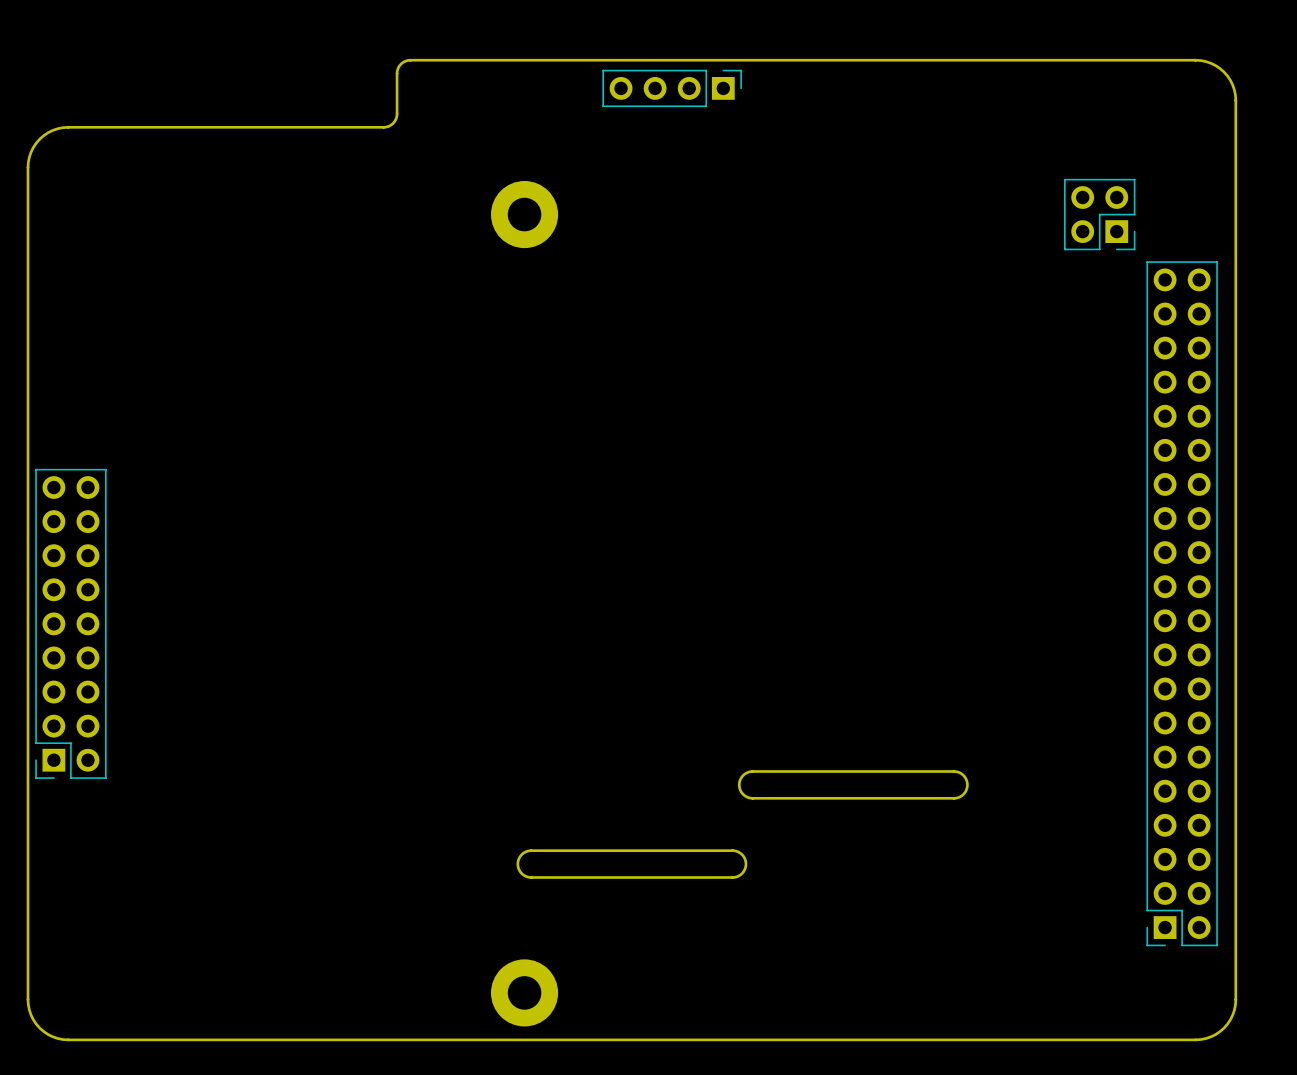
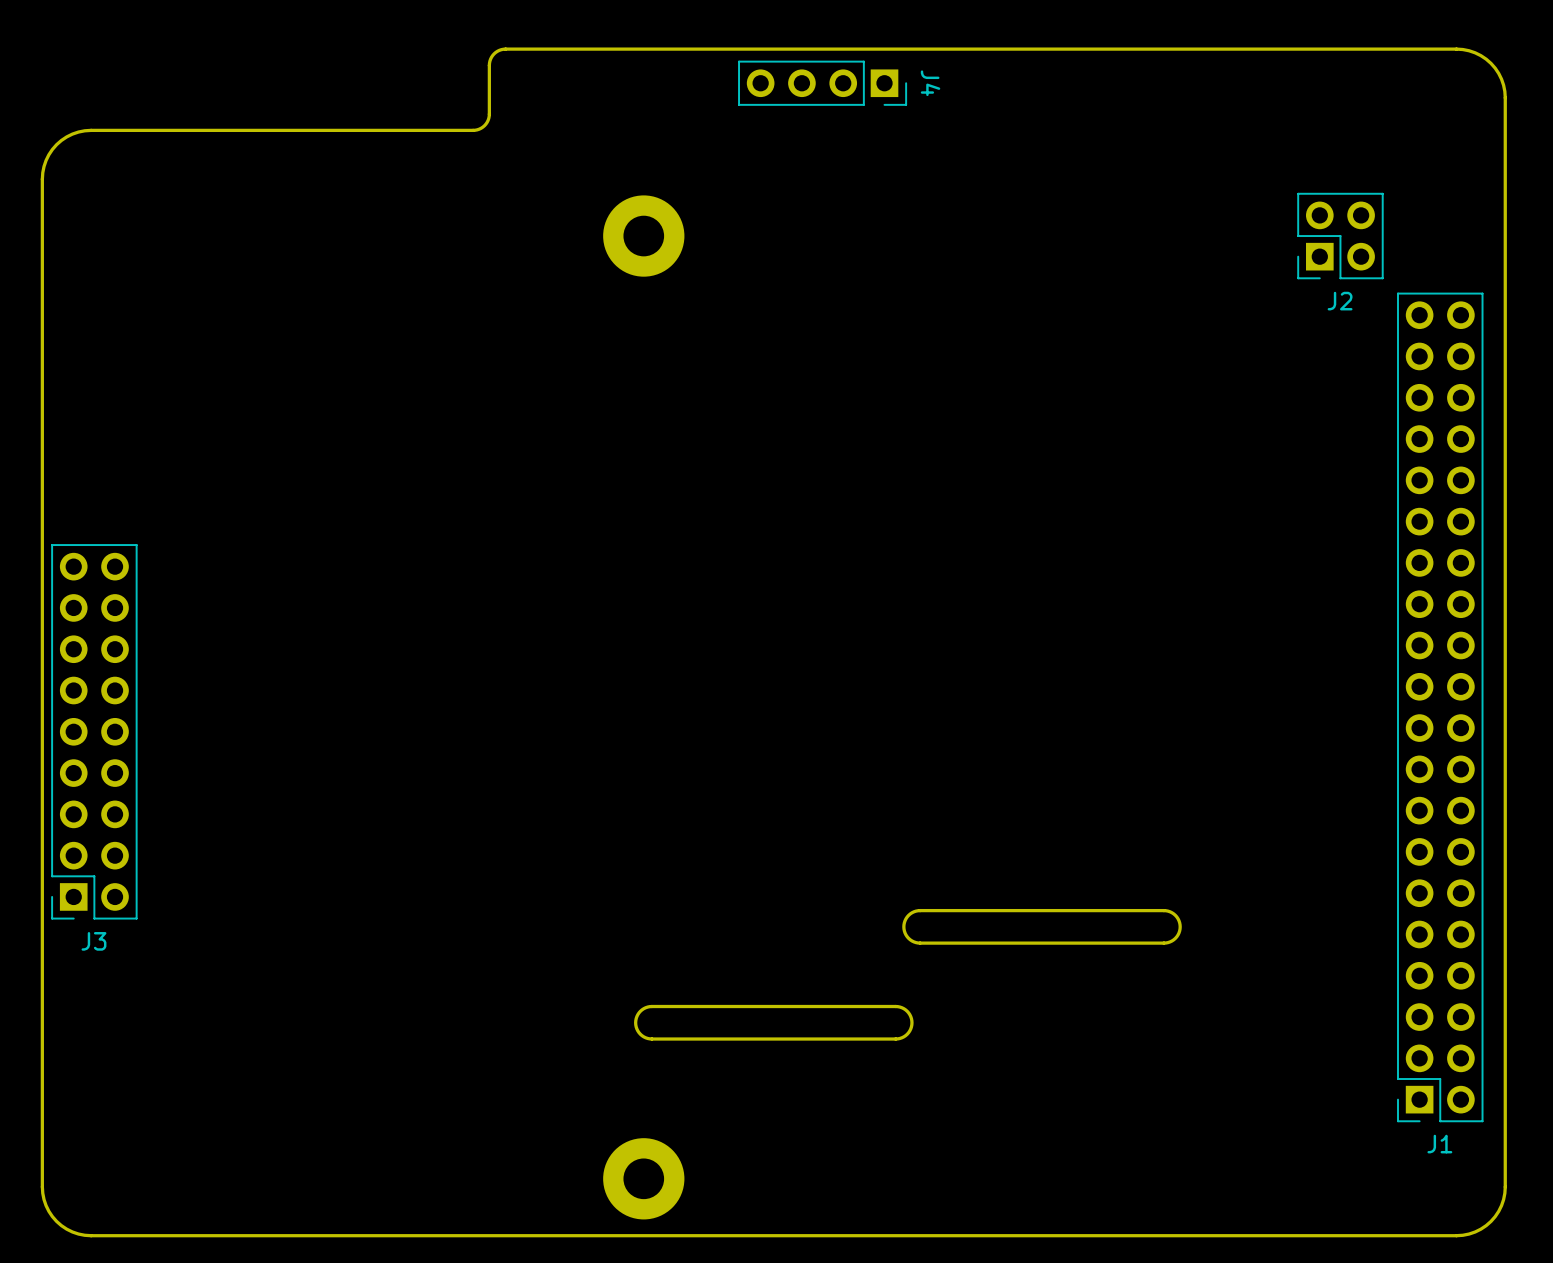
part: (672, 88) -> none
J4: none -> (822, 83)
part: (1099, 214) -> none
J2: none -> (1340, 236)
J3 name: none -> J3 (93, 941)
J1 name: none -> J1 (1439, 1144)

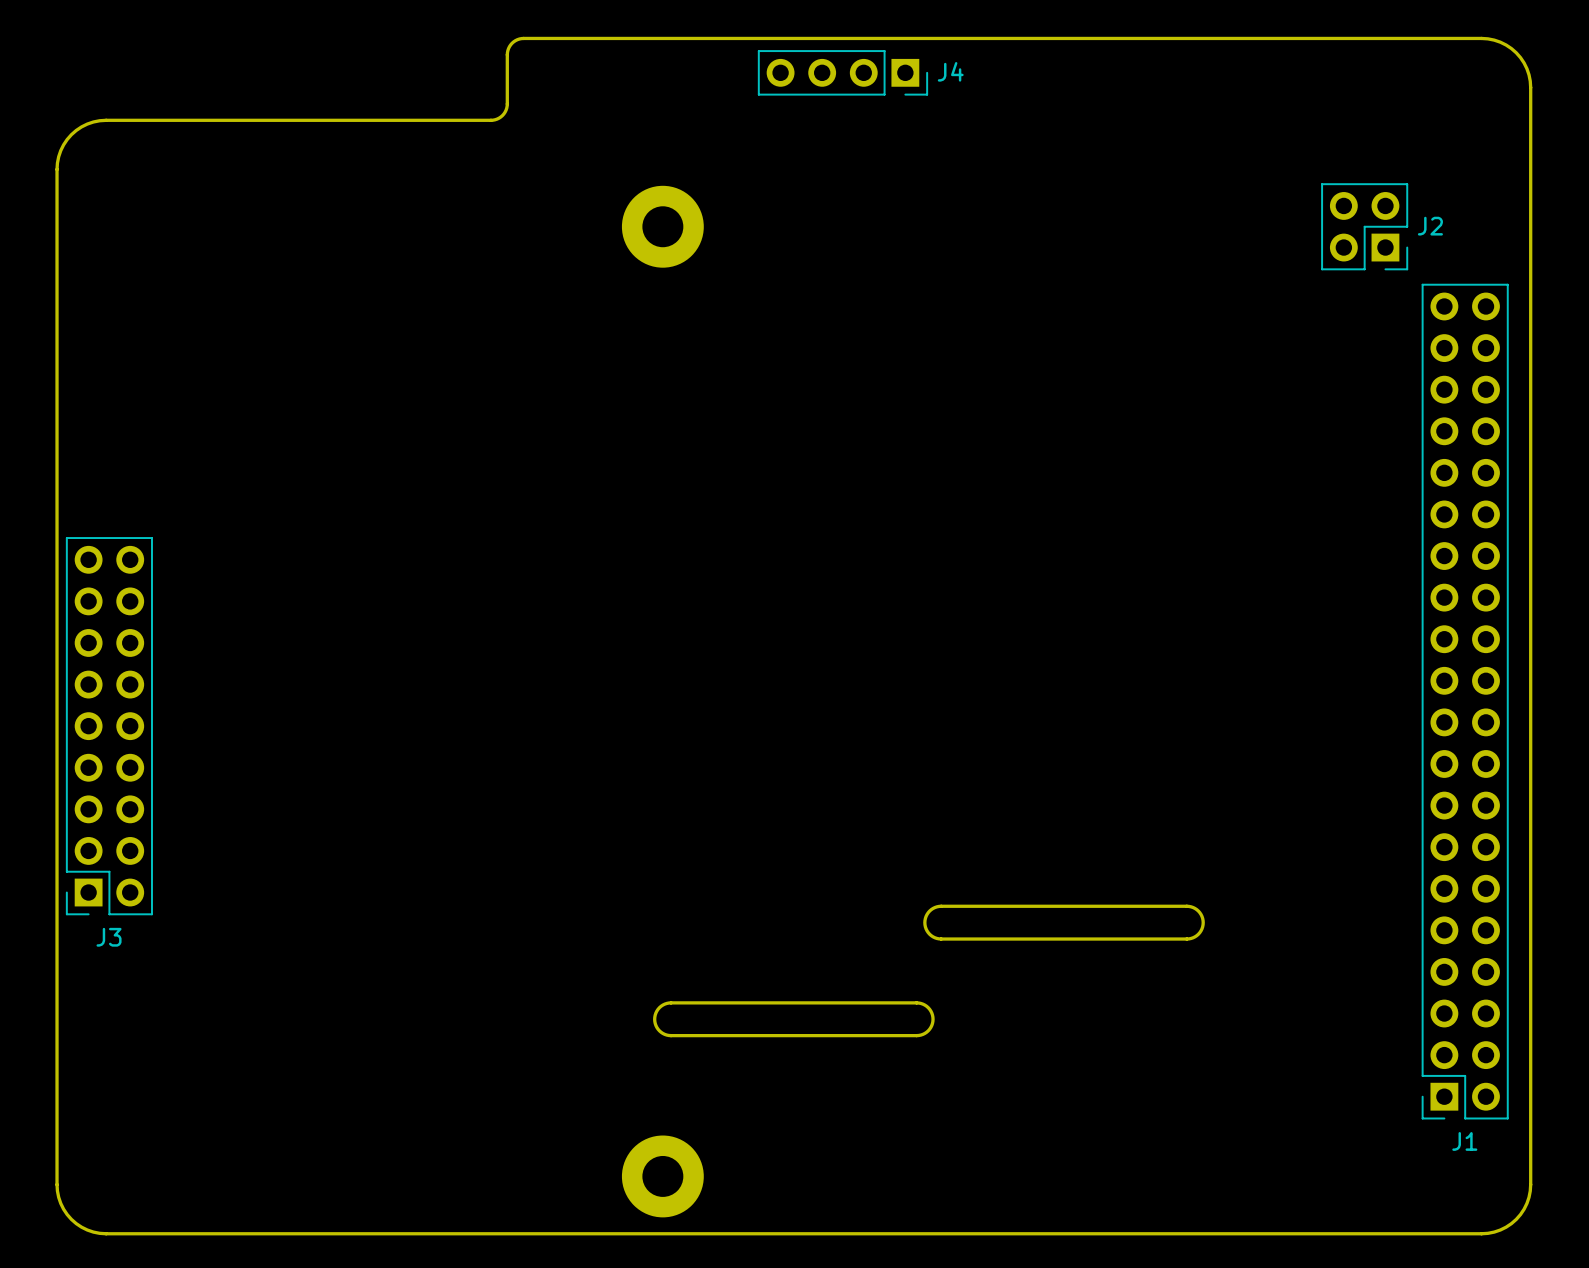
J4 name rotation: 0° (930, 83) -> 90° counterclockwise (950, 71)
J2 rotation: 0° (1340, 236) -> 90° counterclockwise (1364, 226)

